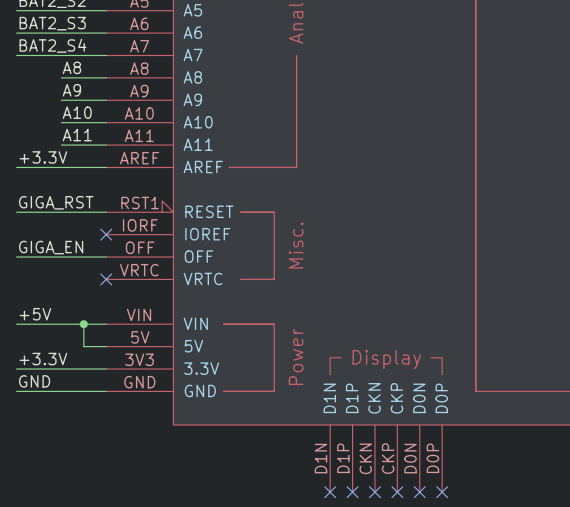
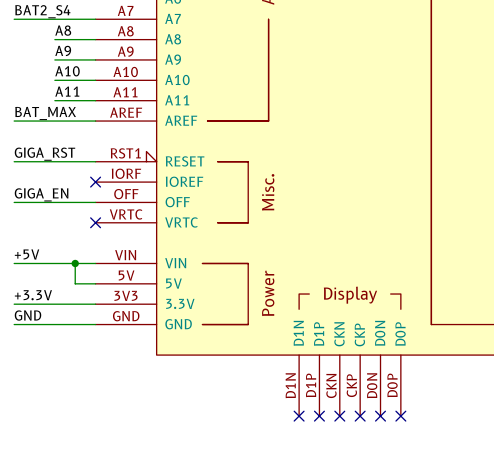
label: +3.3V (43, 157) -> BAT_MAX (45, 113)

